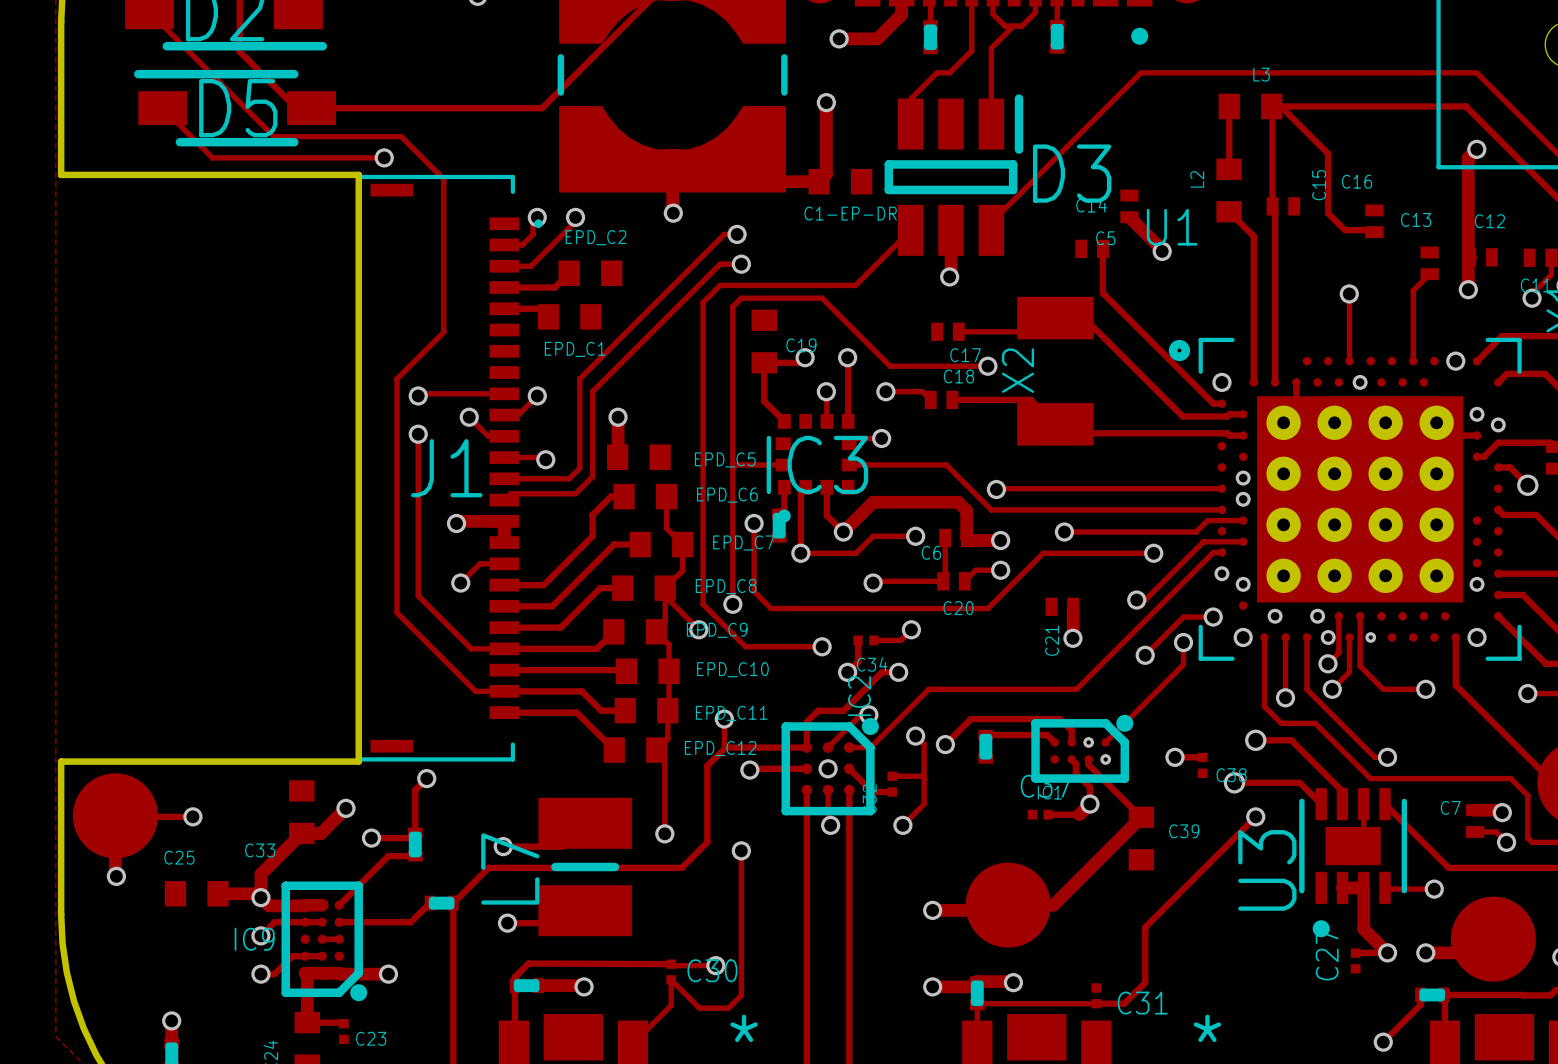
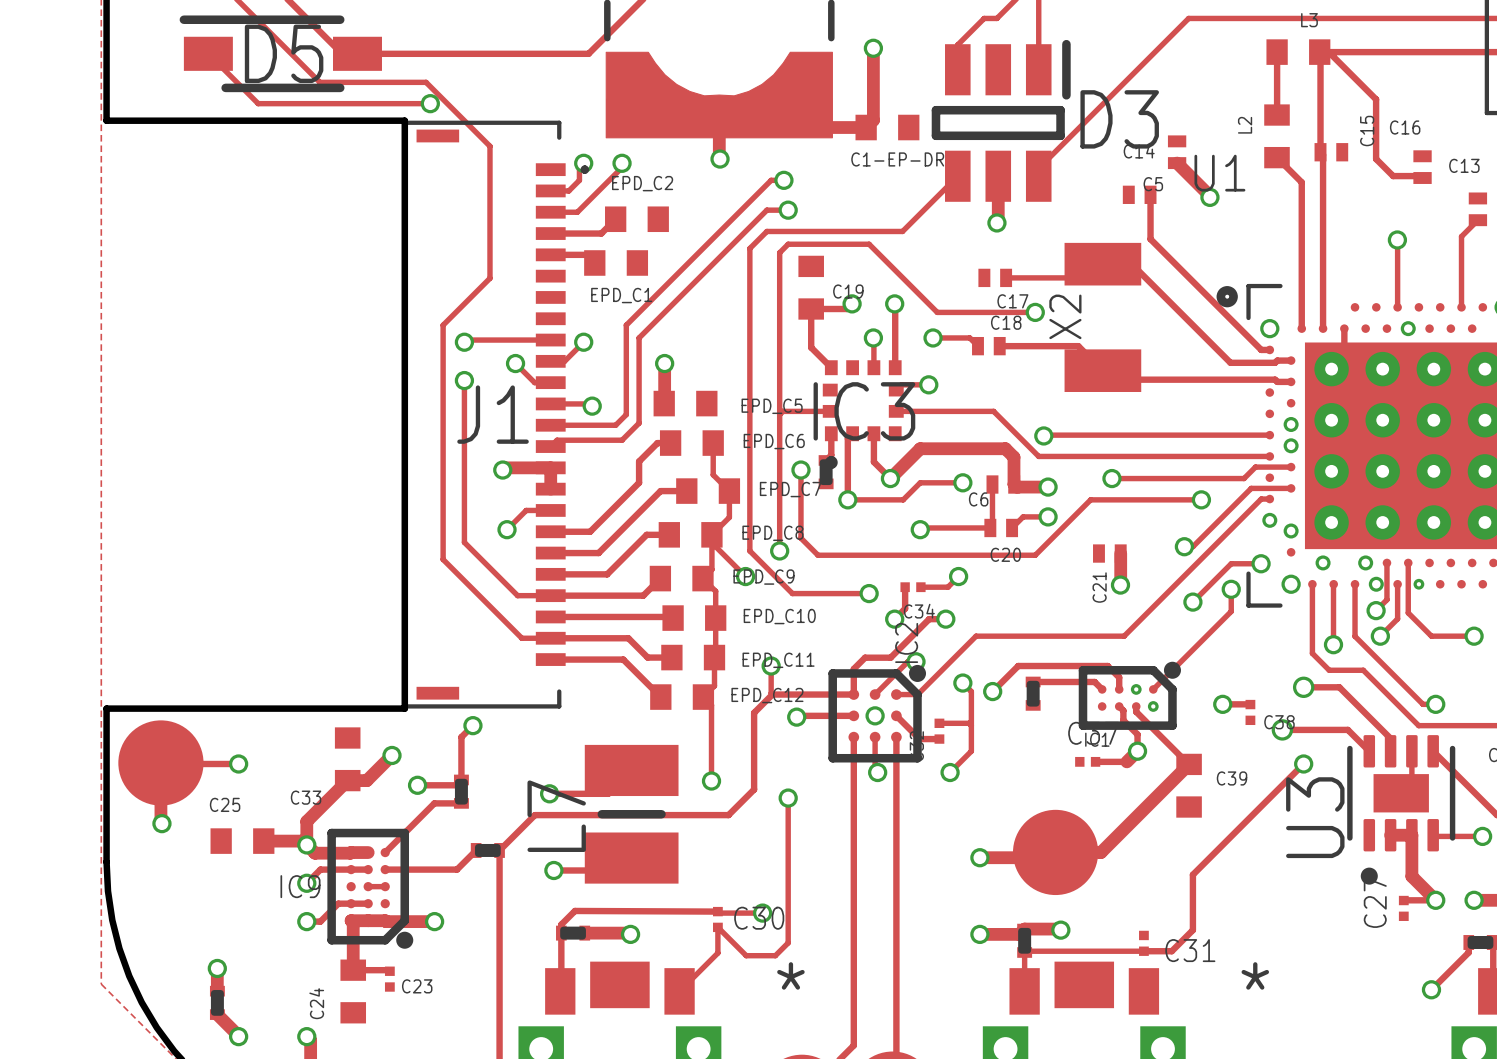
track: (379, 136) (401, 136) (443, 179) (443, 200) -> (426, 82) (489, 146)

